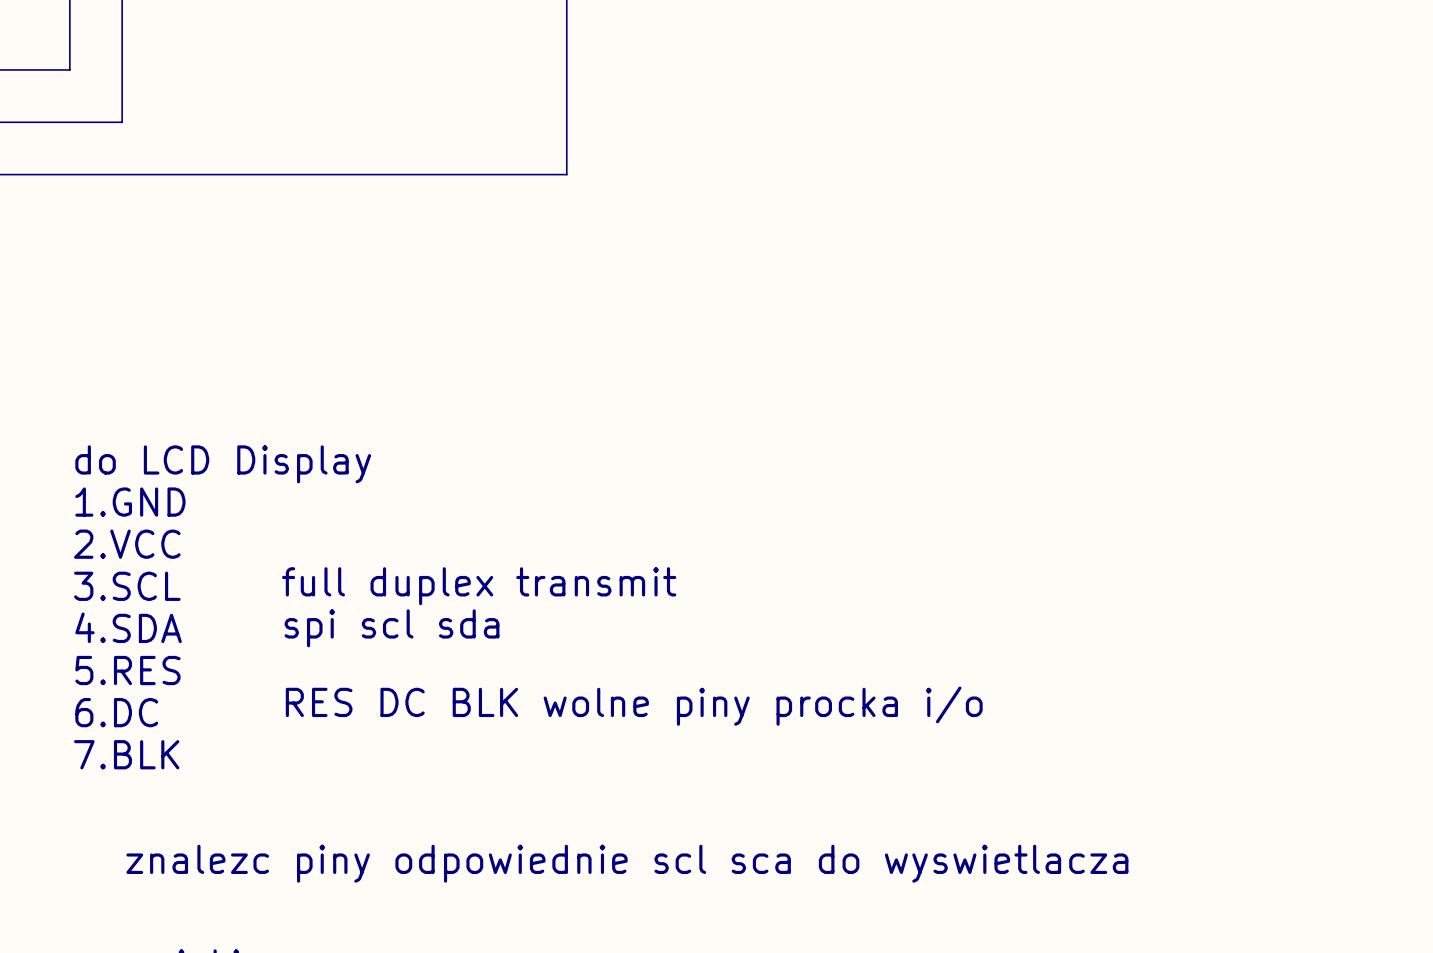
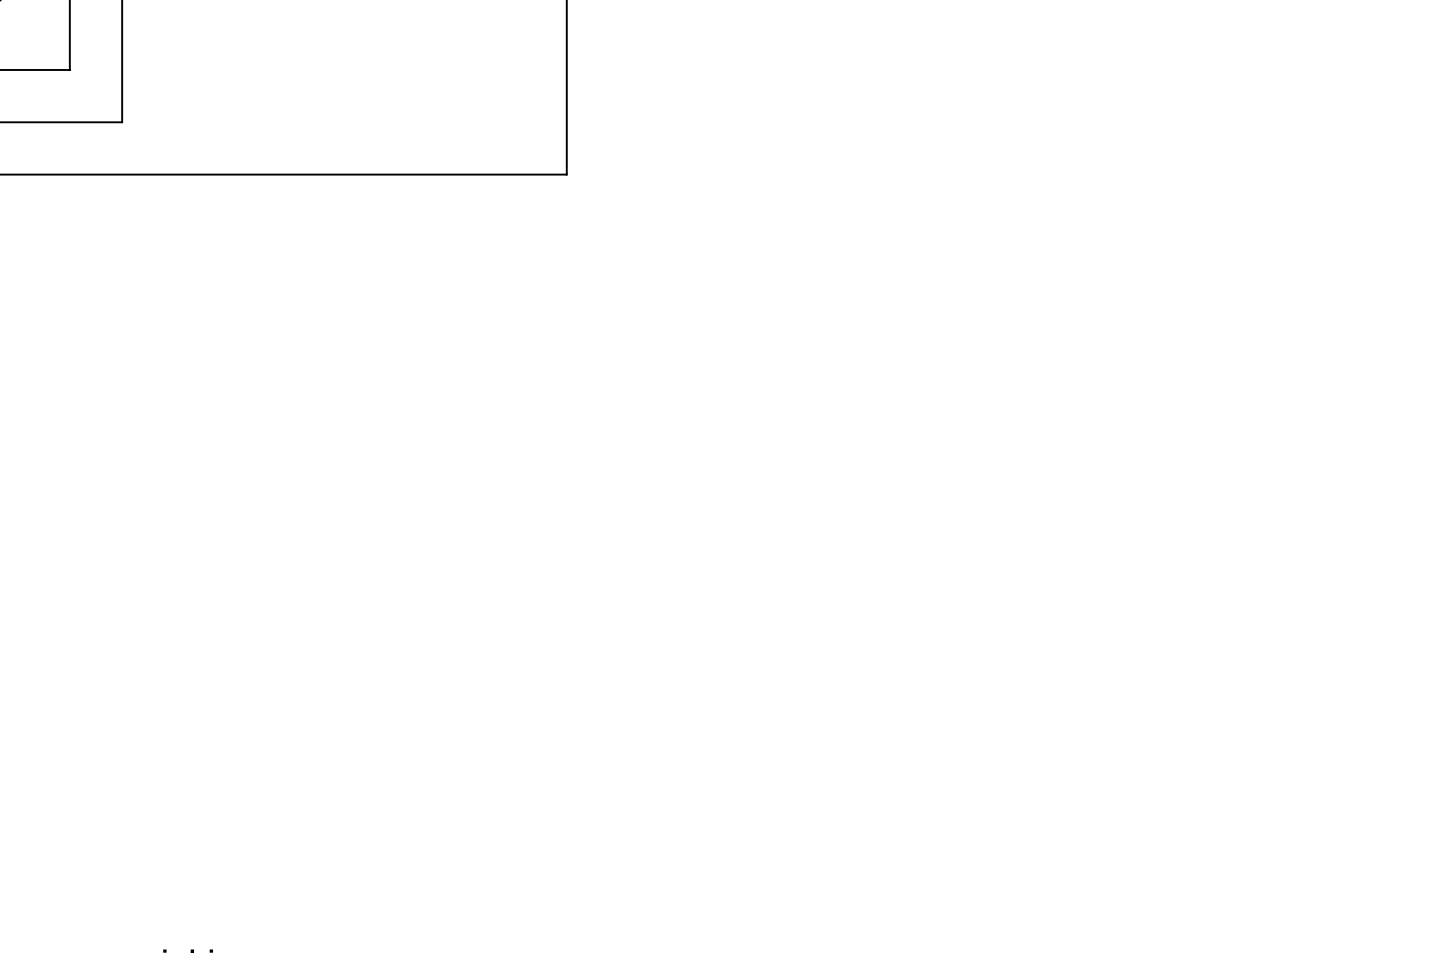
text: do LCD Display (223, 464) -> none
text: 1.GND (130, 502) -> none
text: 2.VCC (127, 544) -> none
text: 3.SCL (127, 586) -> none
text: full duplex transmit (479, 586) -> none
text: 4.SDA (128, 627) -> none
text: spi scl sda (391, 628) -> none
text: 5.RES (127, 670) -> none
text: RES DC BLK wolne piny procka i/o (634, 706) -> none
text: 6.DC (116, 712) -> none
text: 7.BLK (126, 754) -> none
text: znalezc piny odpowiednie scl sca do wyswietlacza (627, 863) -> none

